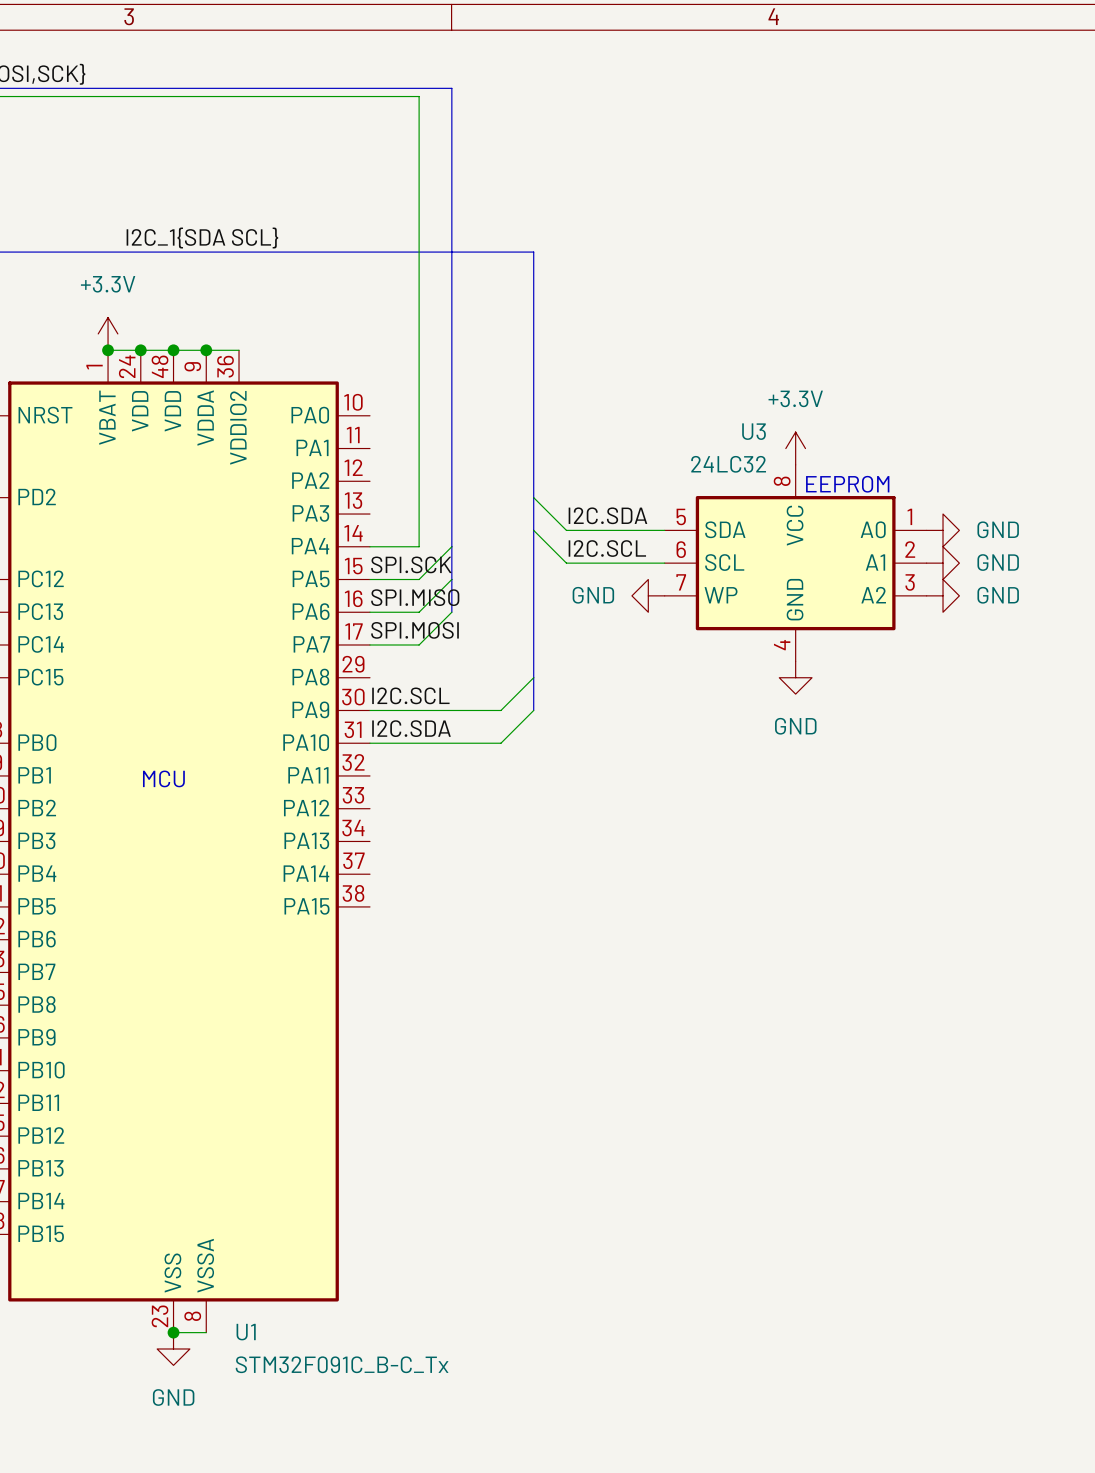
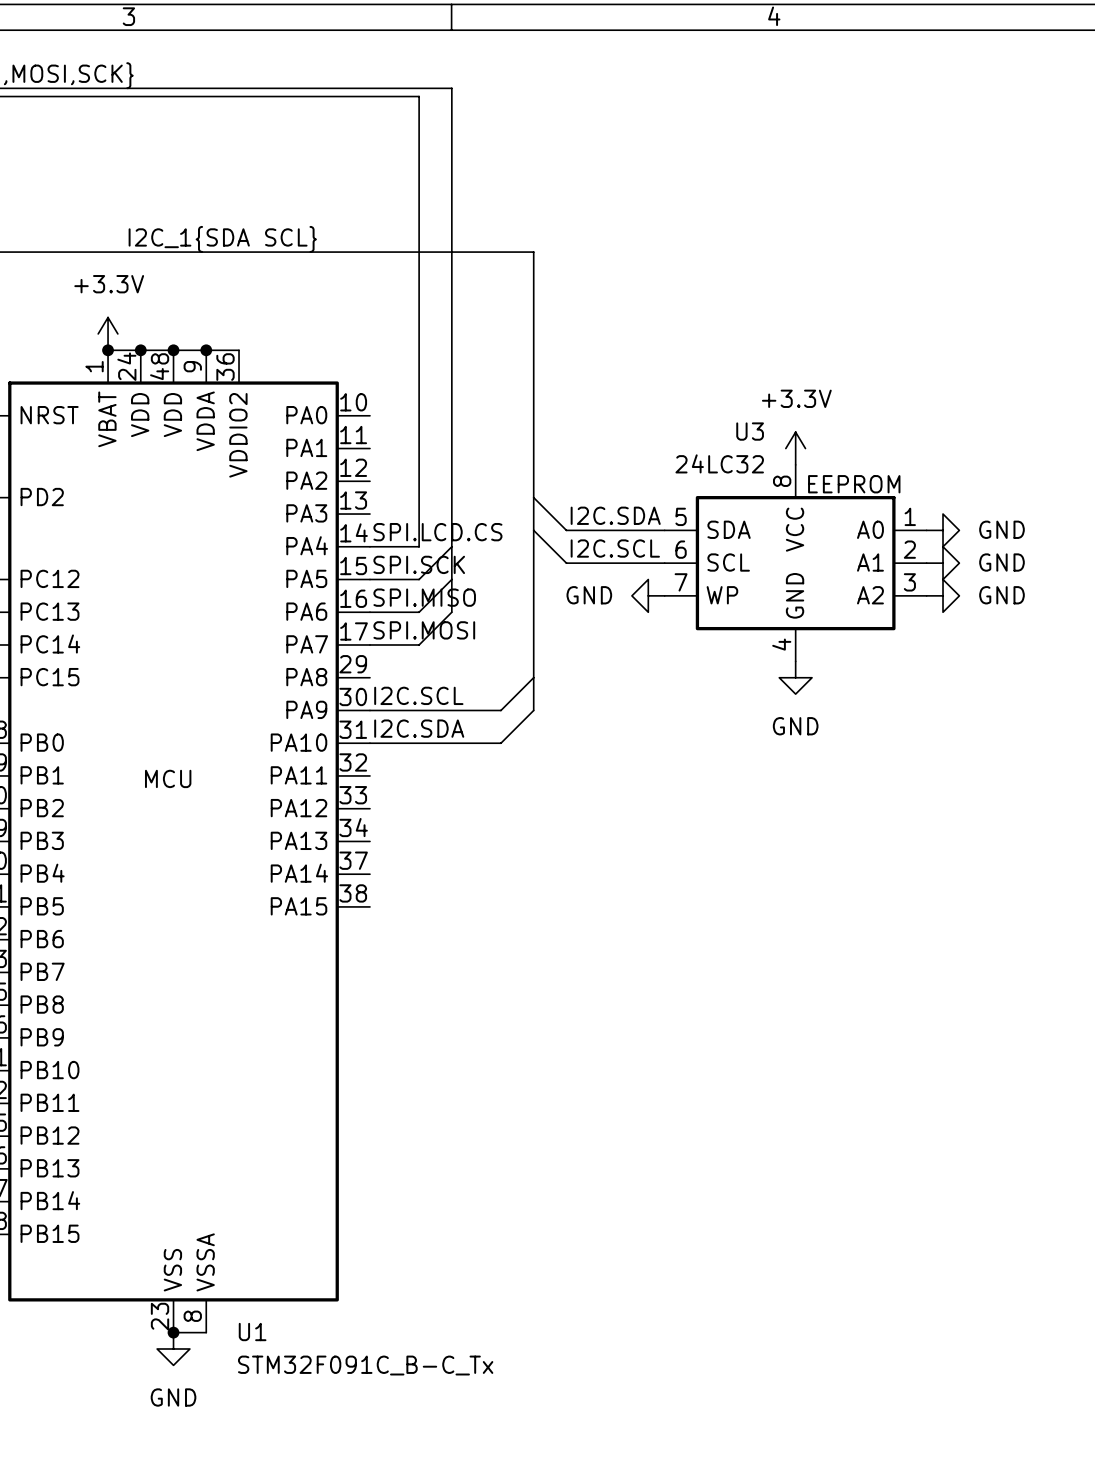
label: none -> SPI.LCD.CS (437, 532)

